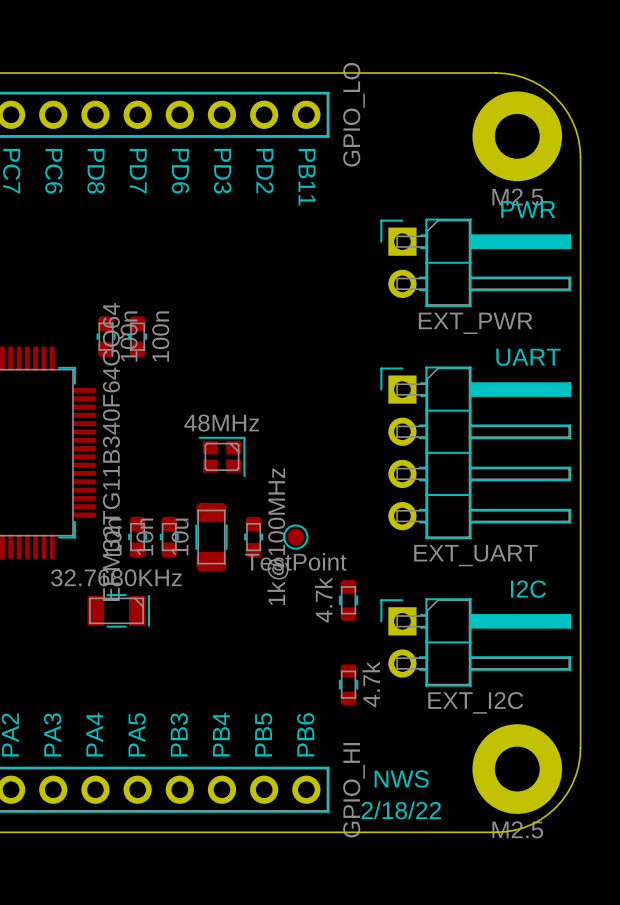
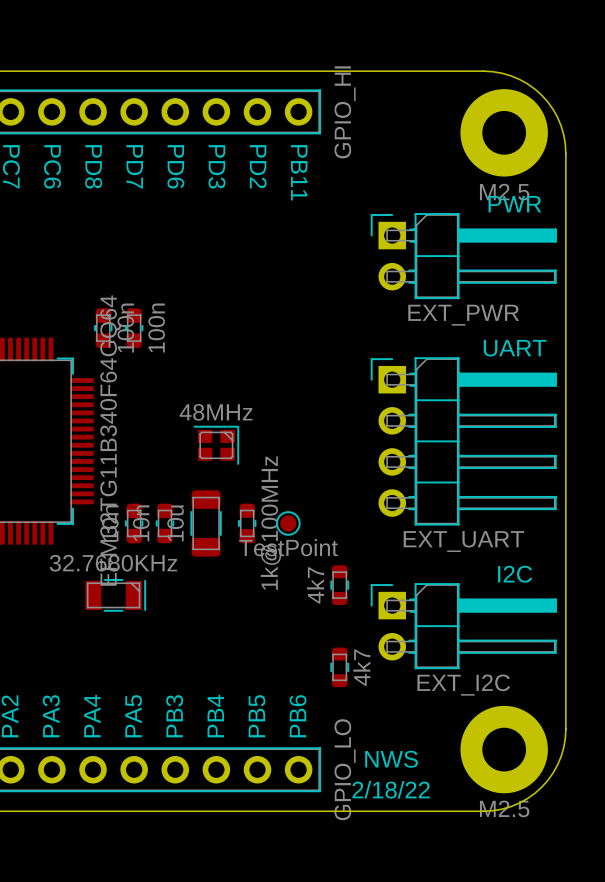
part value: GPIO_LO (354, 114) -> GPIO_HI (345, 112)
part value: 4.7k (323, 600) -> 4k7 (315, 585)
part value: 4.7k (371, 684) -> 4k7 (361, 667)
part value: GPIO_HI (354, 790) -> GPIO_LO (345, 769)

